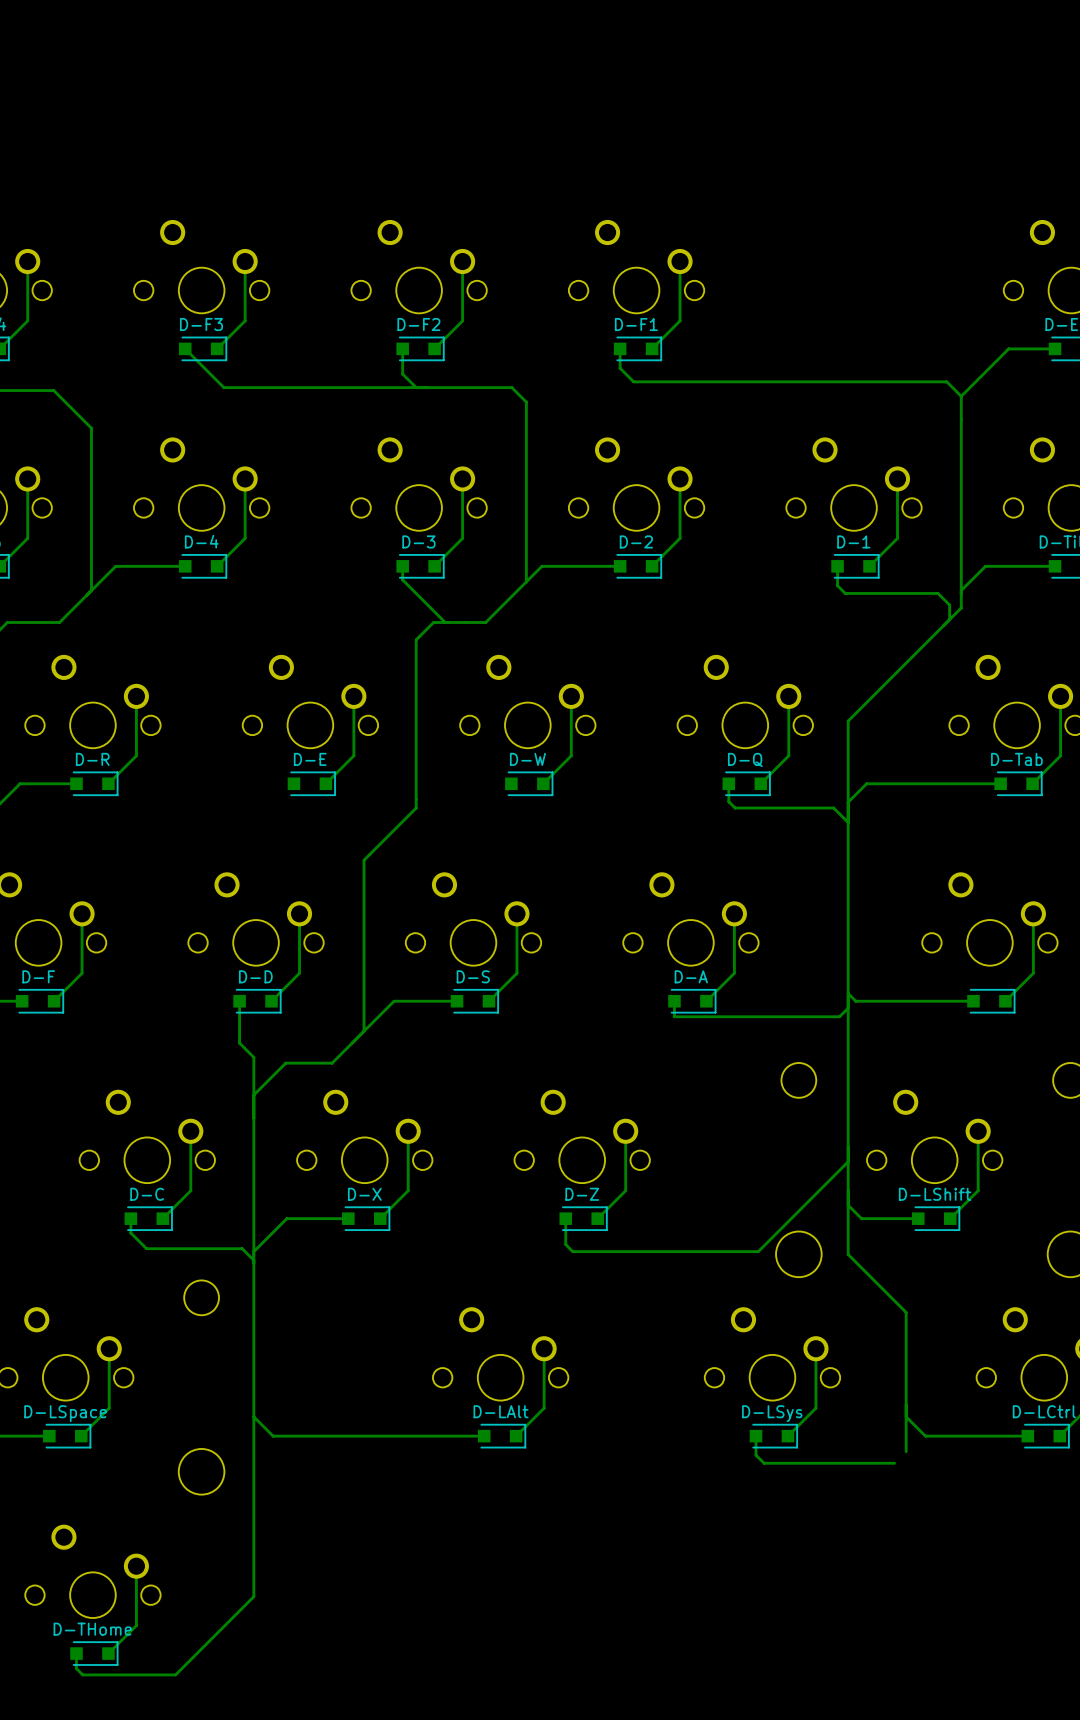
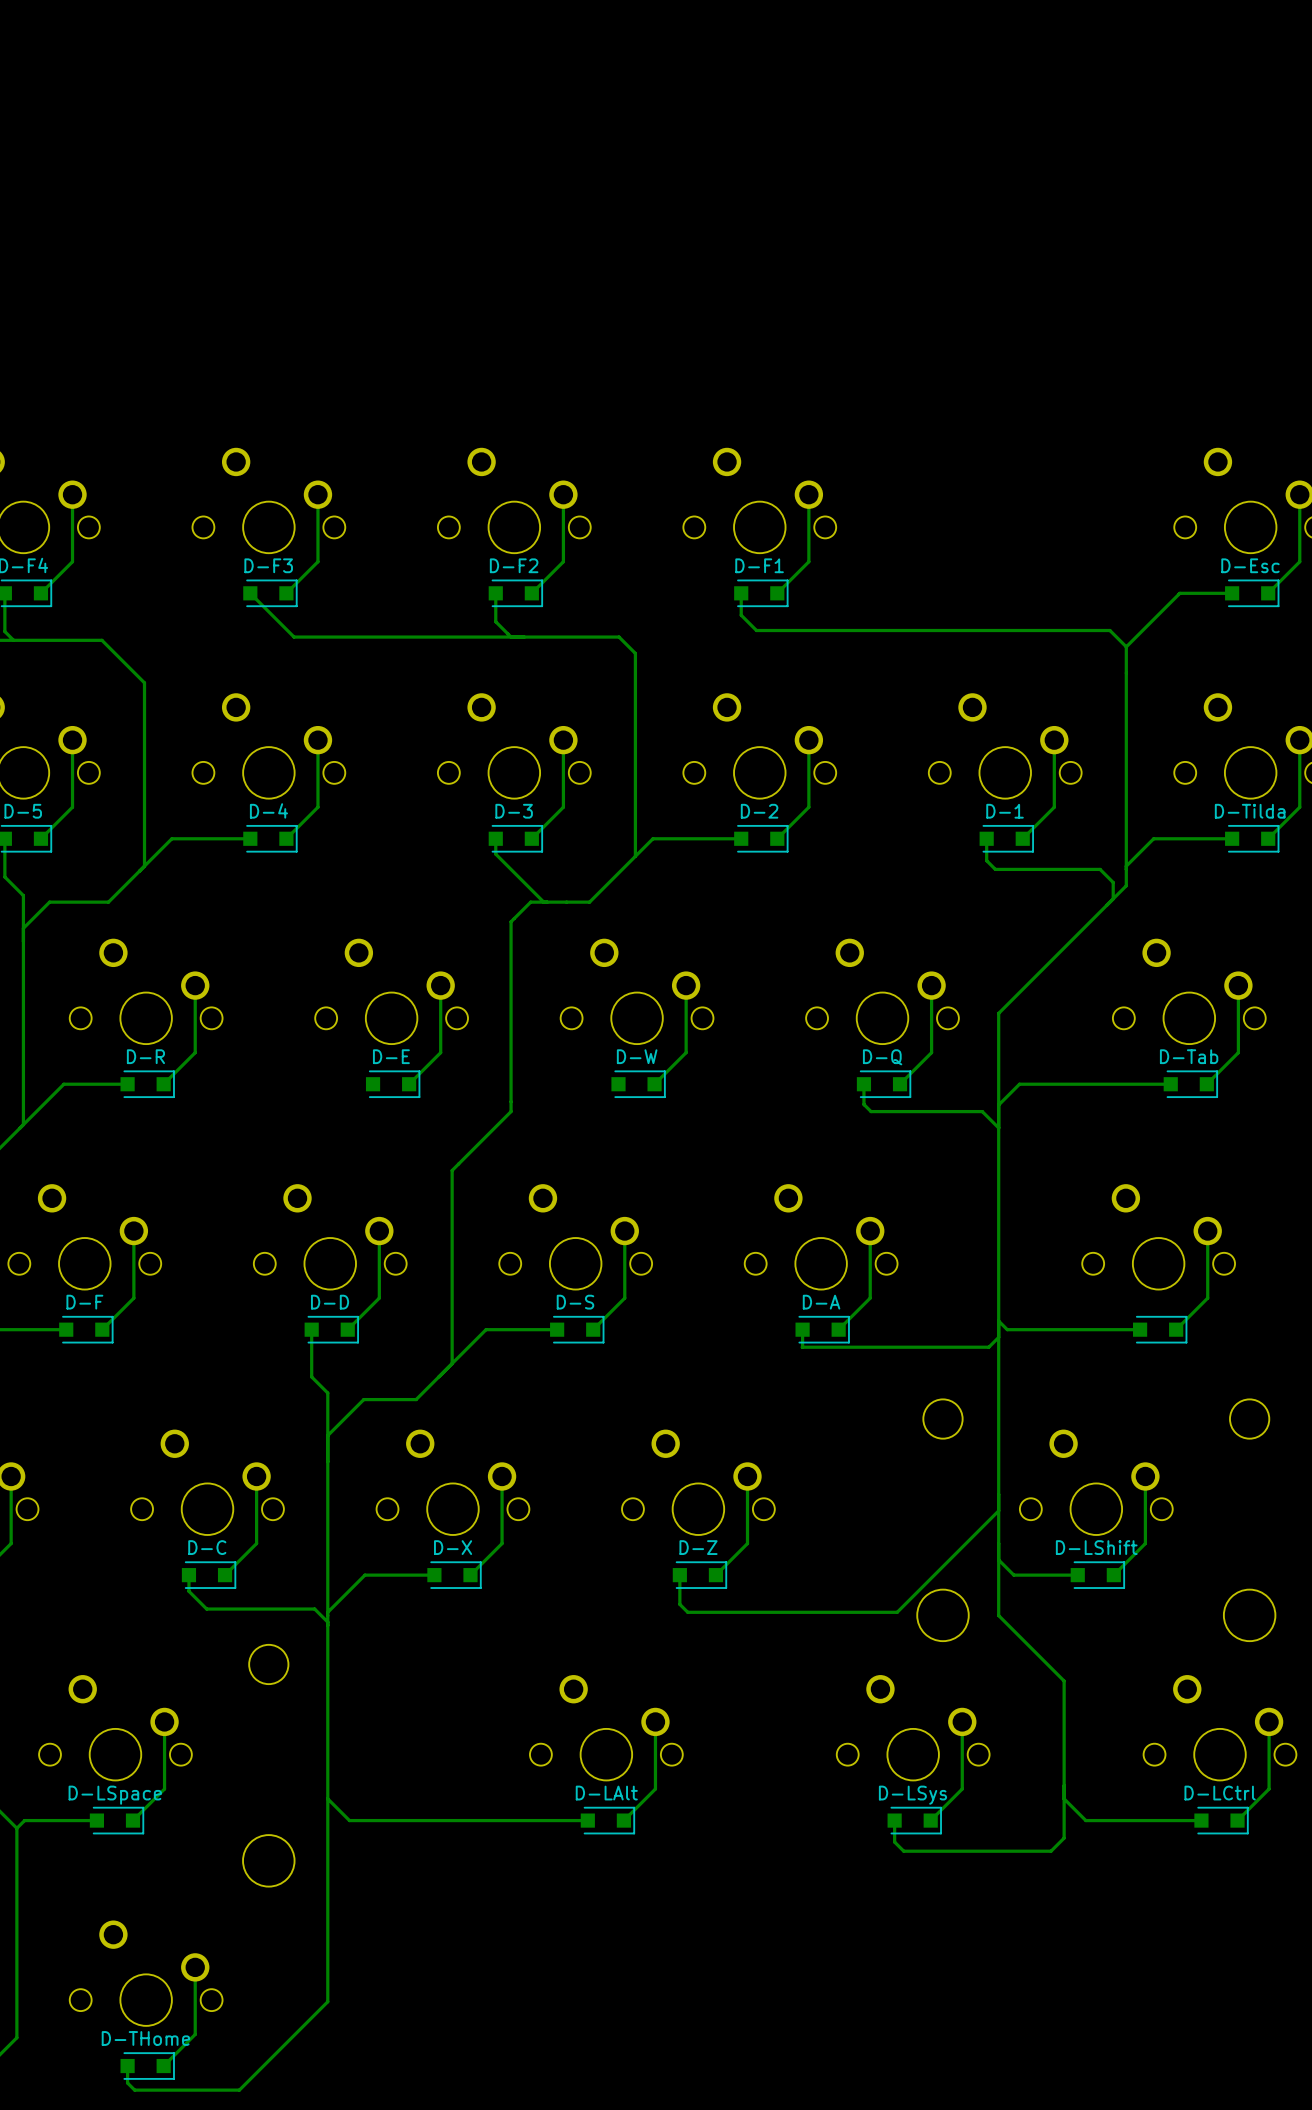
track: none -> (1064, 1838) (1051, 1851)

